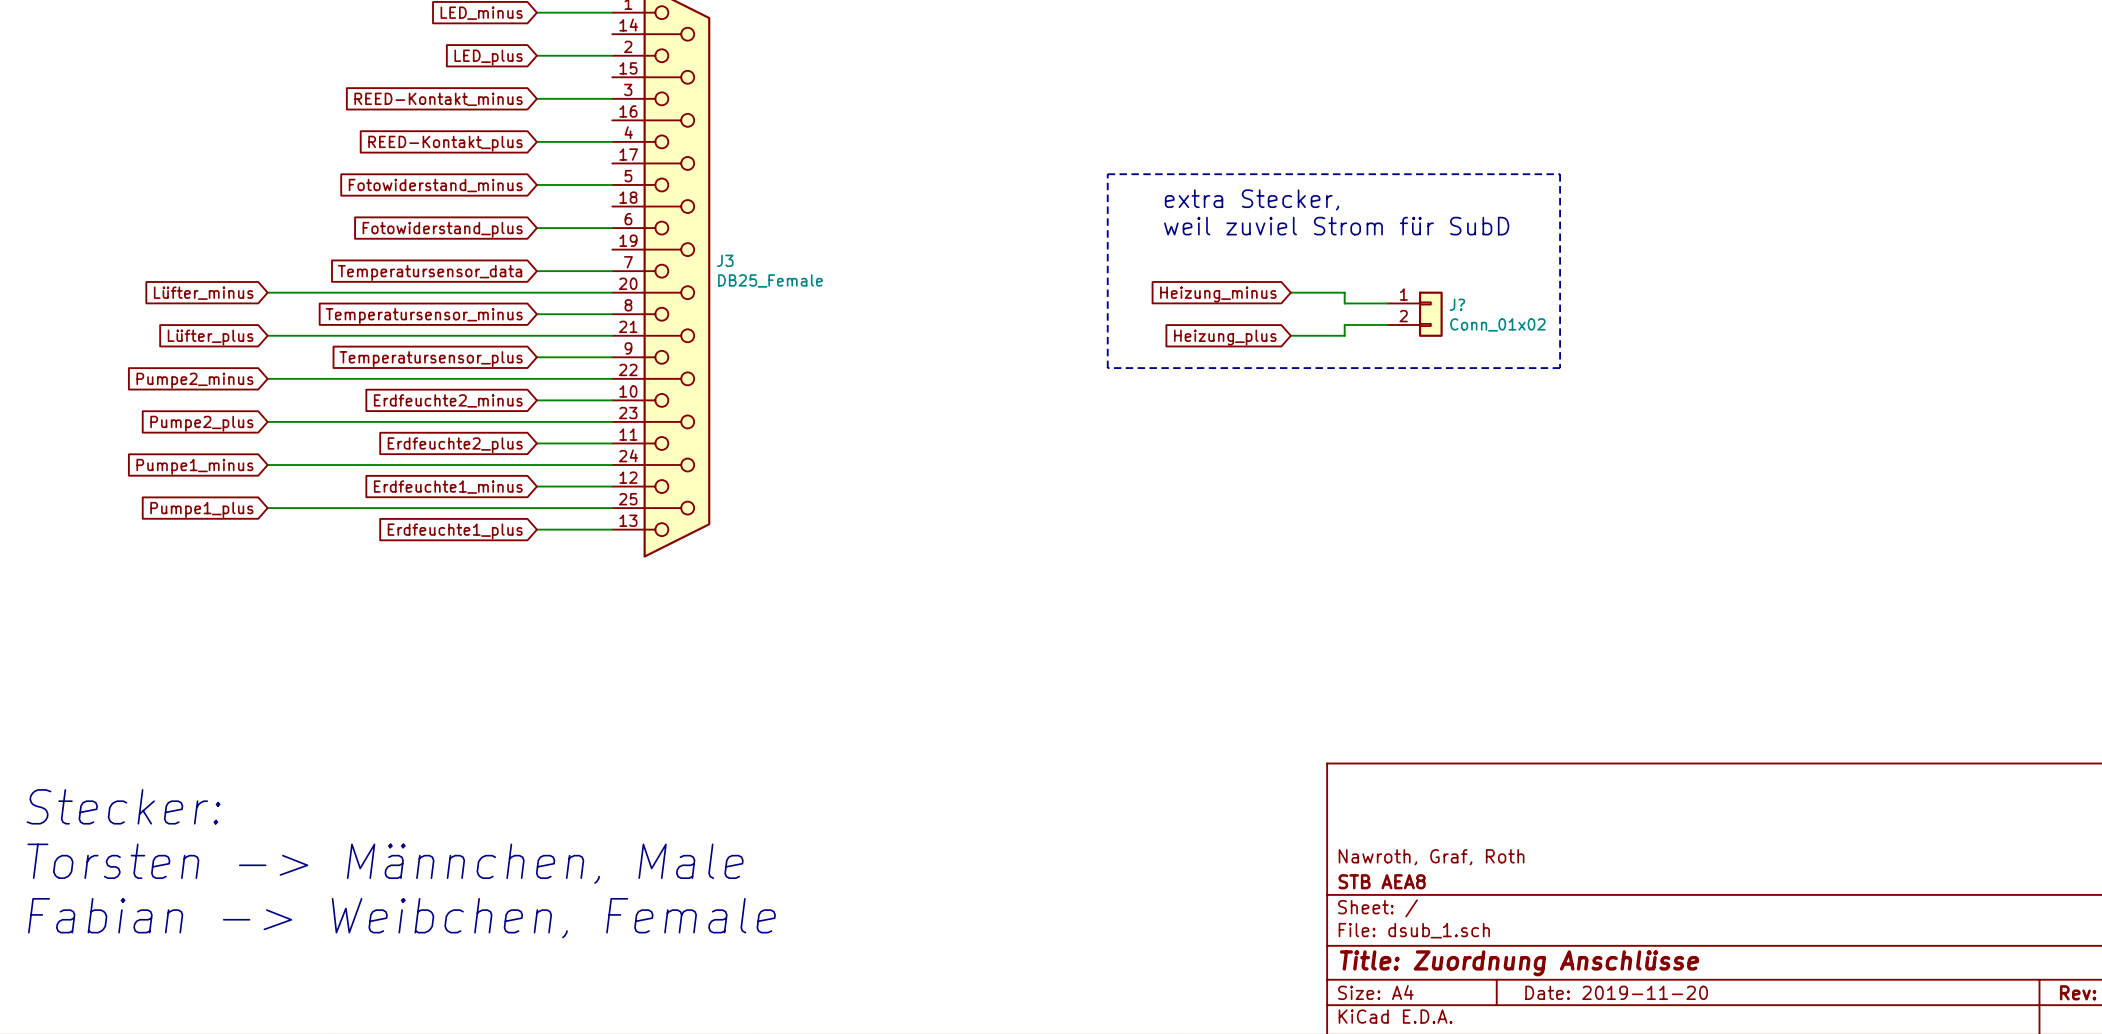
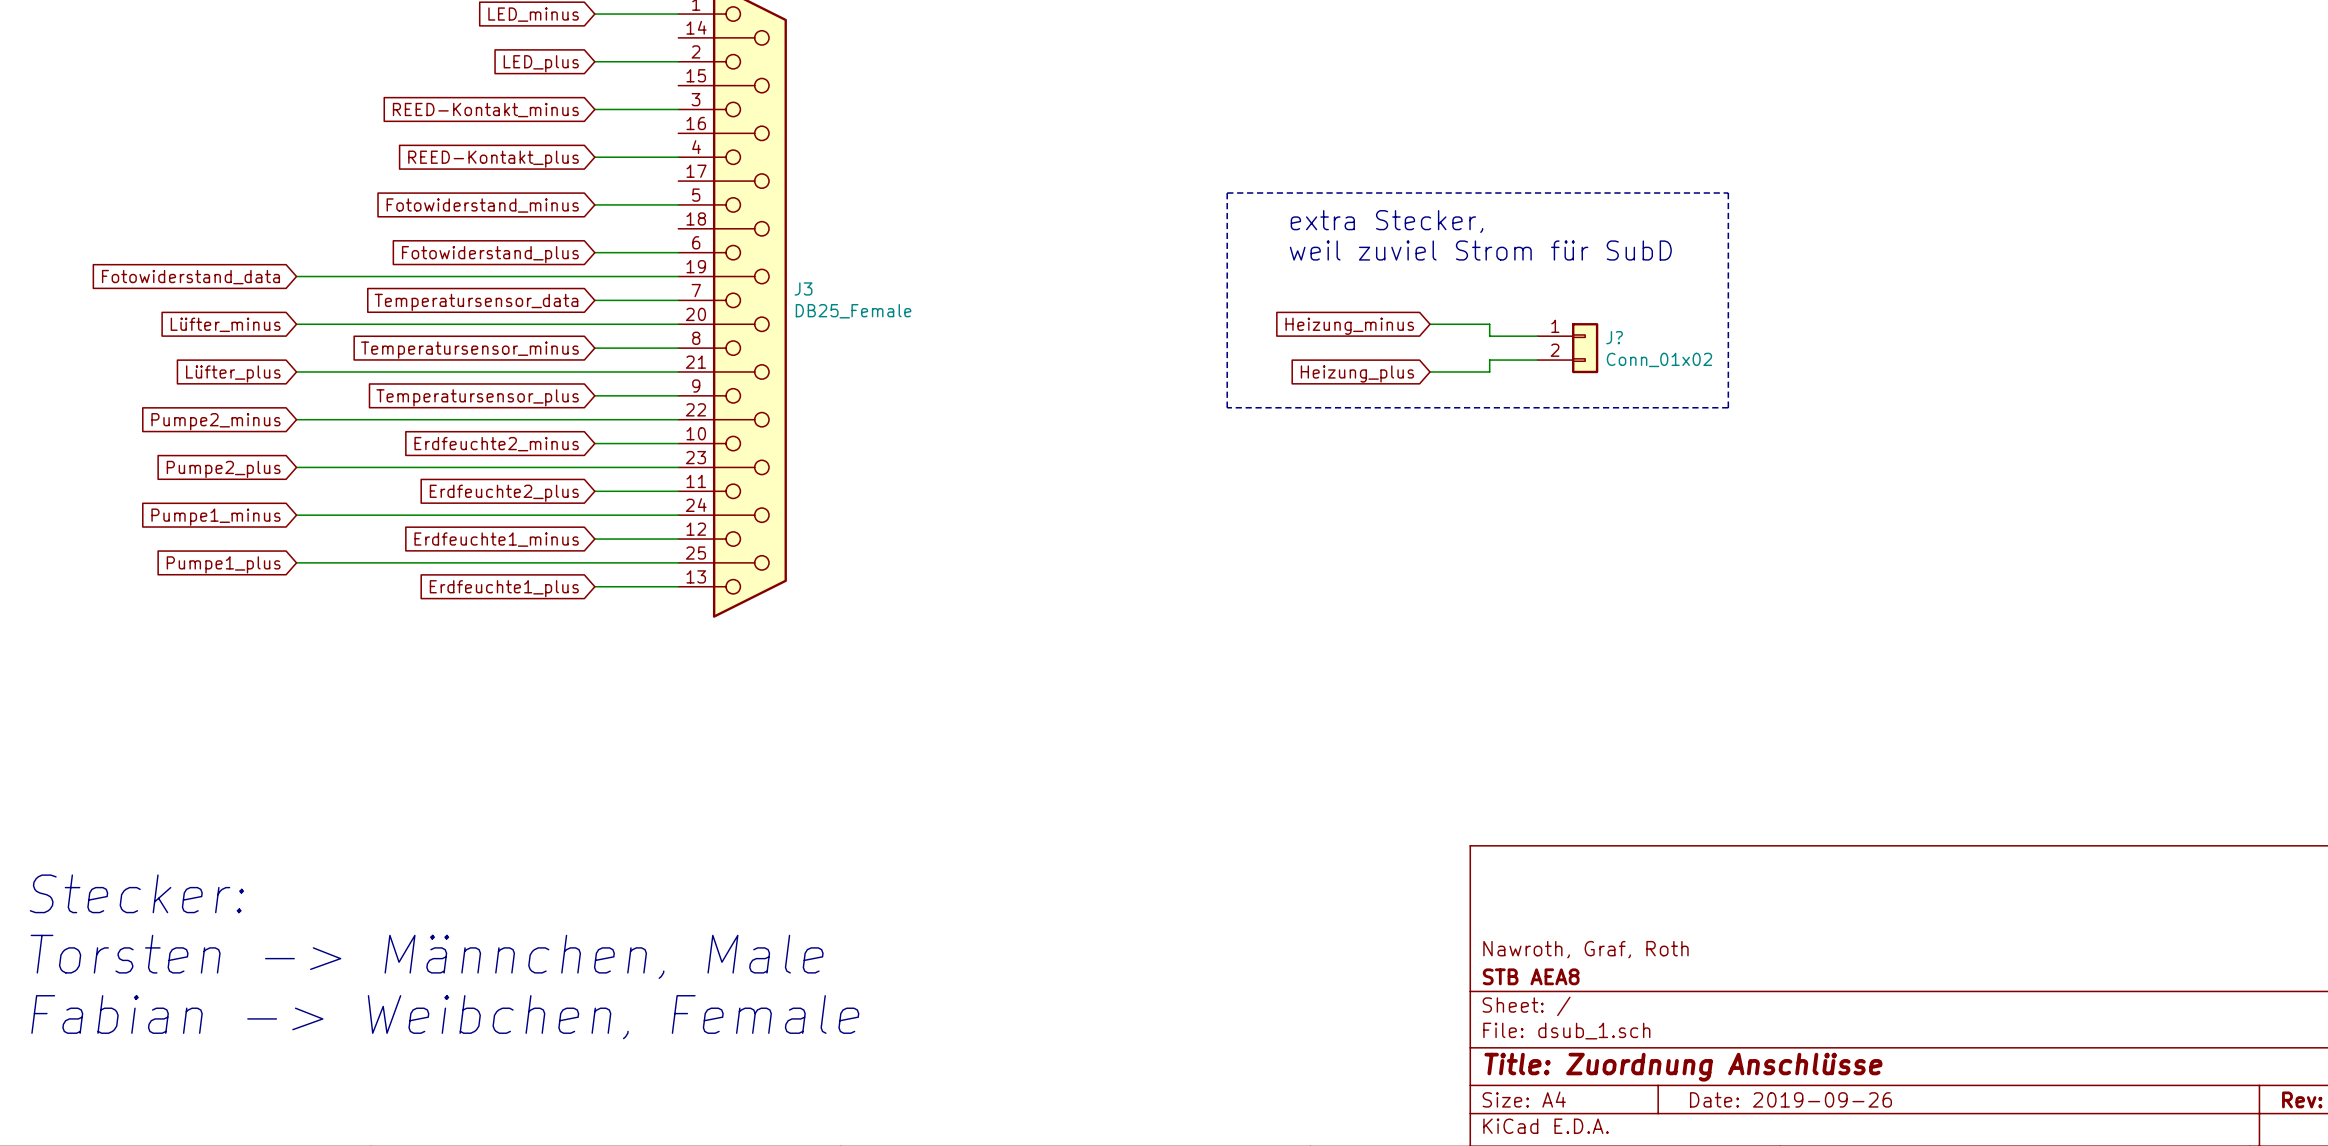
wire: none -> (296, 276) (678, 276)
global label: none -> Fotowiderstand_data (190, 277)
title block: Date: 2019-11-20 (1616, 992) -> Date: 2019-09-26 (1790, 1099)

